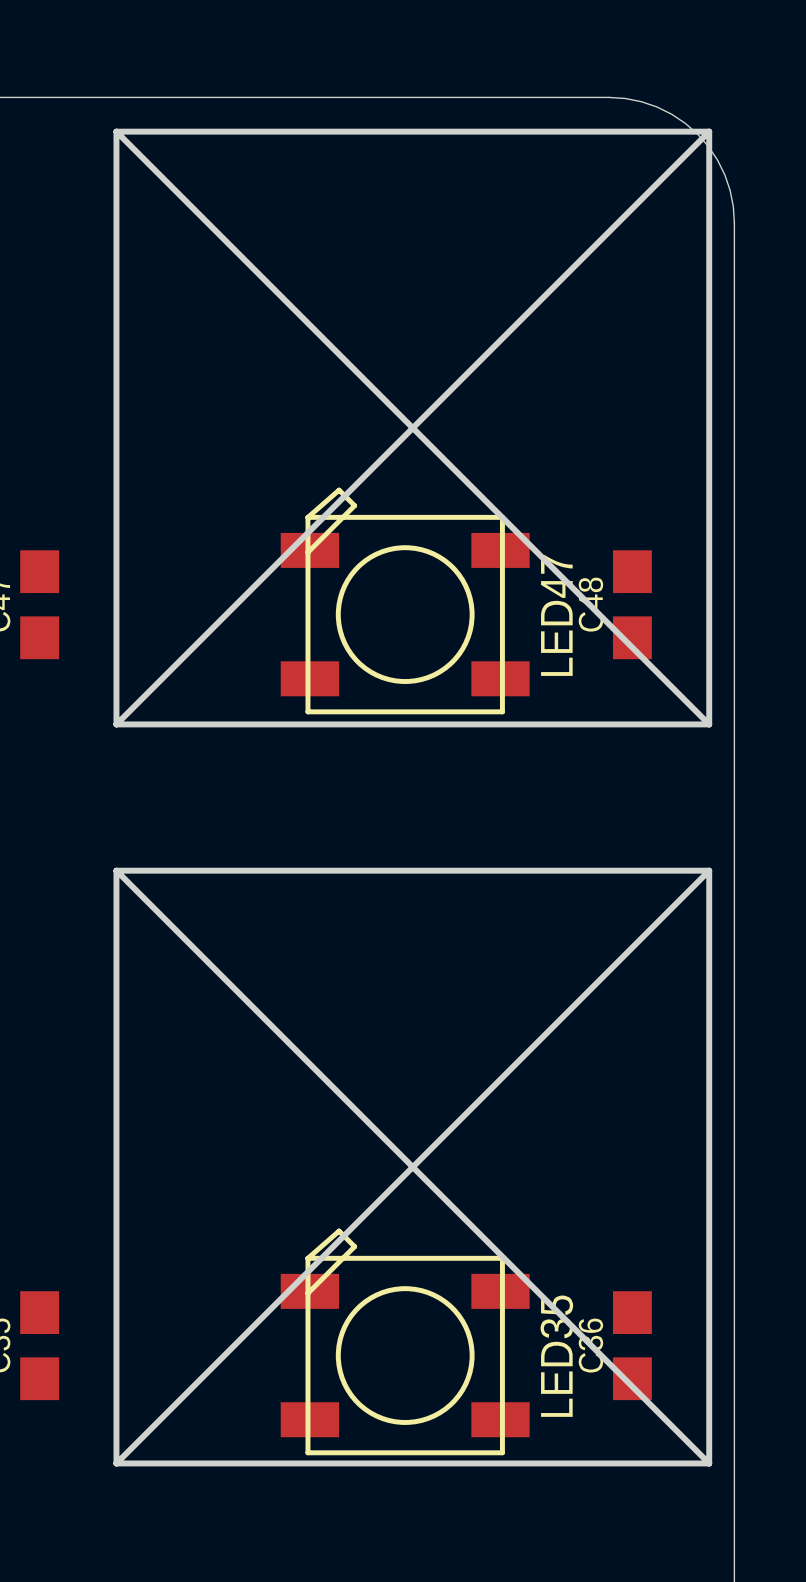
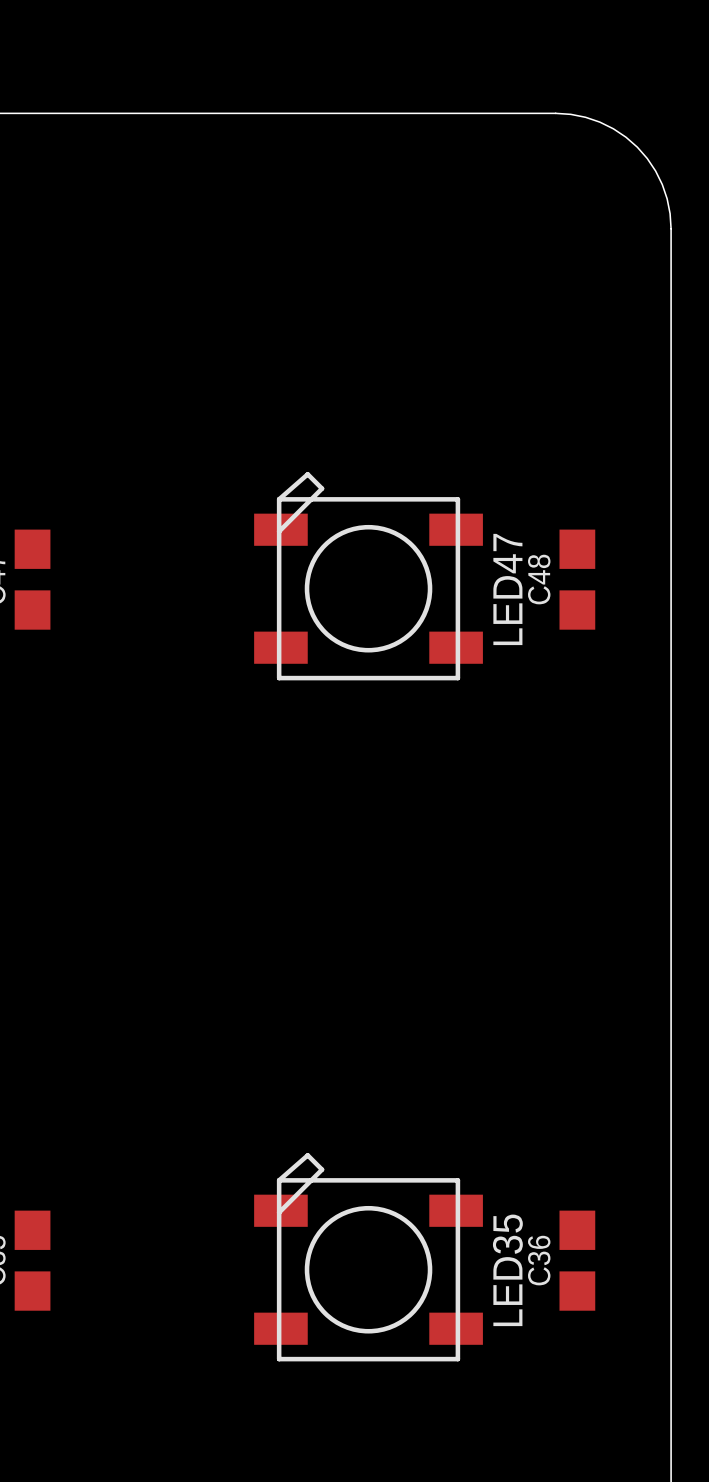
board edge: (116, 131) (709, 131) -> none
board edge: (116, 131) (116, 724) -> none
board edge: (116, 131) (709, 724) -> none
board edge: (709, 131) (116, 724) -> none
board edge: (709, 131) (709, 724) -> none
board edge: (116, 724) (709, 724) -> none
board edge: (116, 870) (709, 870) -> none
board edge: (116, 870) (709, 1463) -> none
board edge: (116, 870) (116, 1463) -> none
board edge: (709, 870) (116, 1463) -> none
board edge: (709, 870) (709, 1463) -> none
board edge: (116, 1463) (709, 1463) -> none

